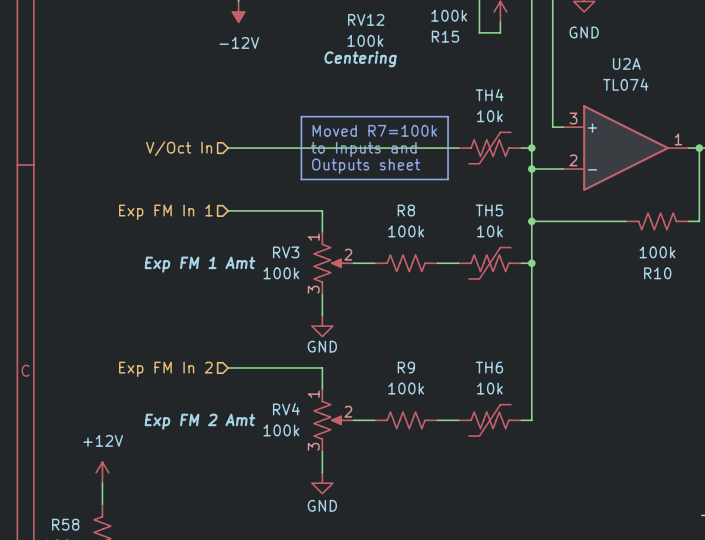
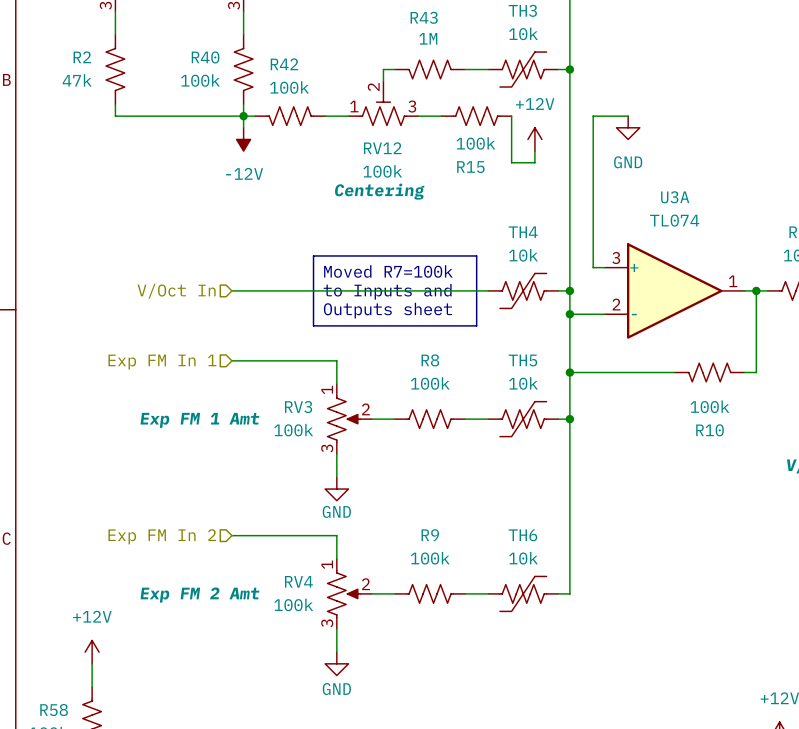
U2A name: U2A (626, 63) -> U3A (675, 197)

